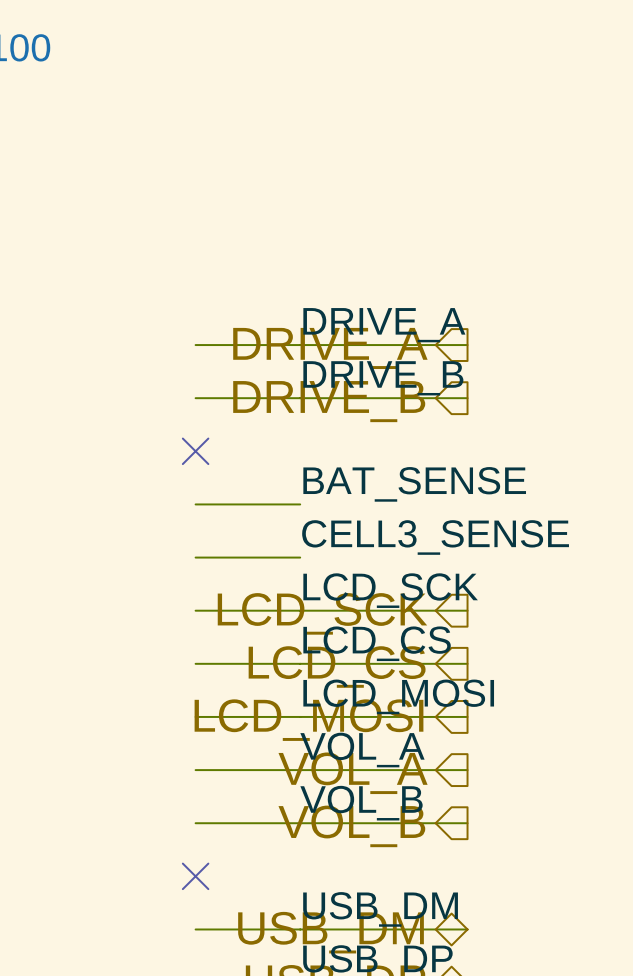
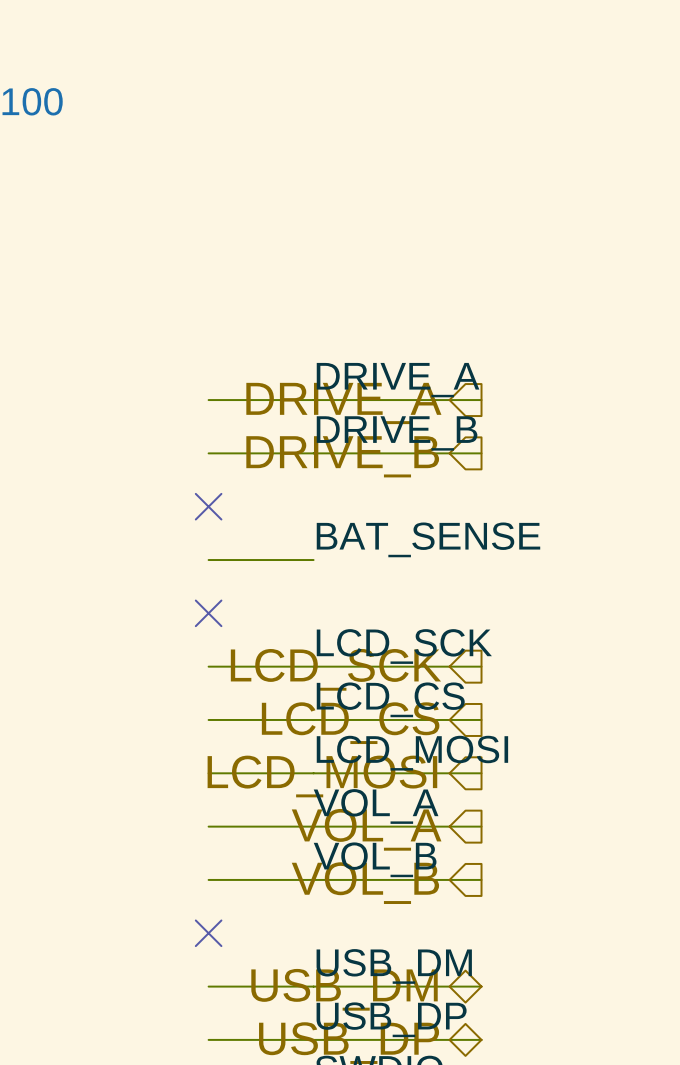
label: CELL3_SENSE (435, 537) -> none
wire: (195, 557) (300, 557) -> none
no-connect mark: none -> (208, 613)

